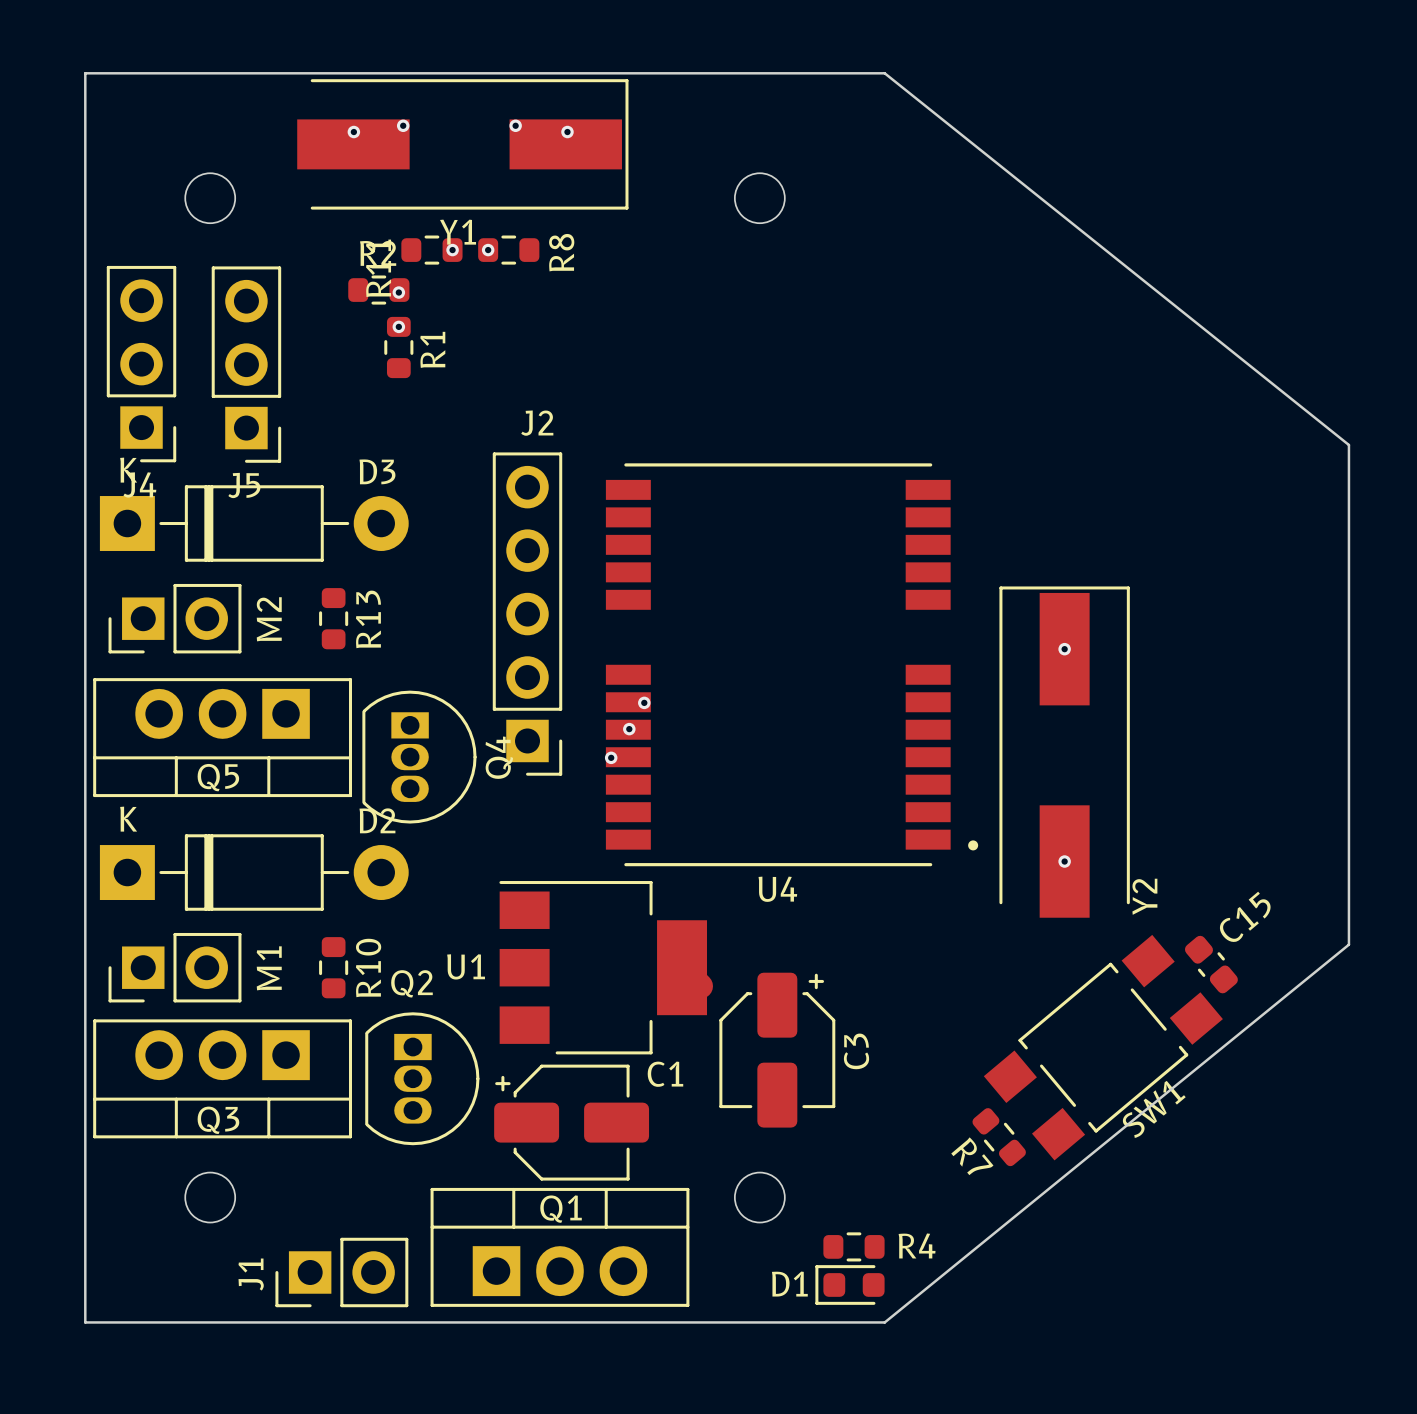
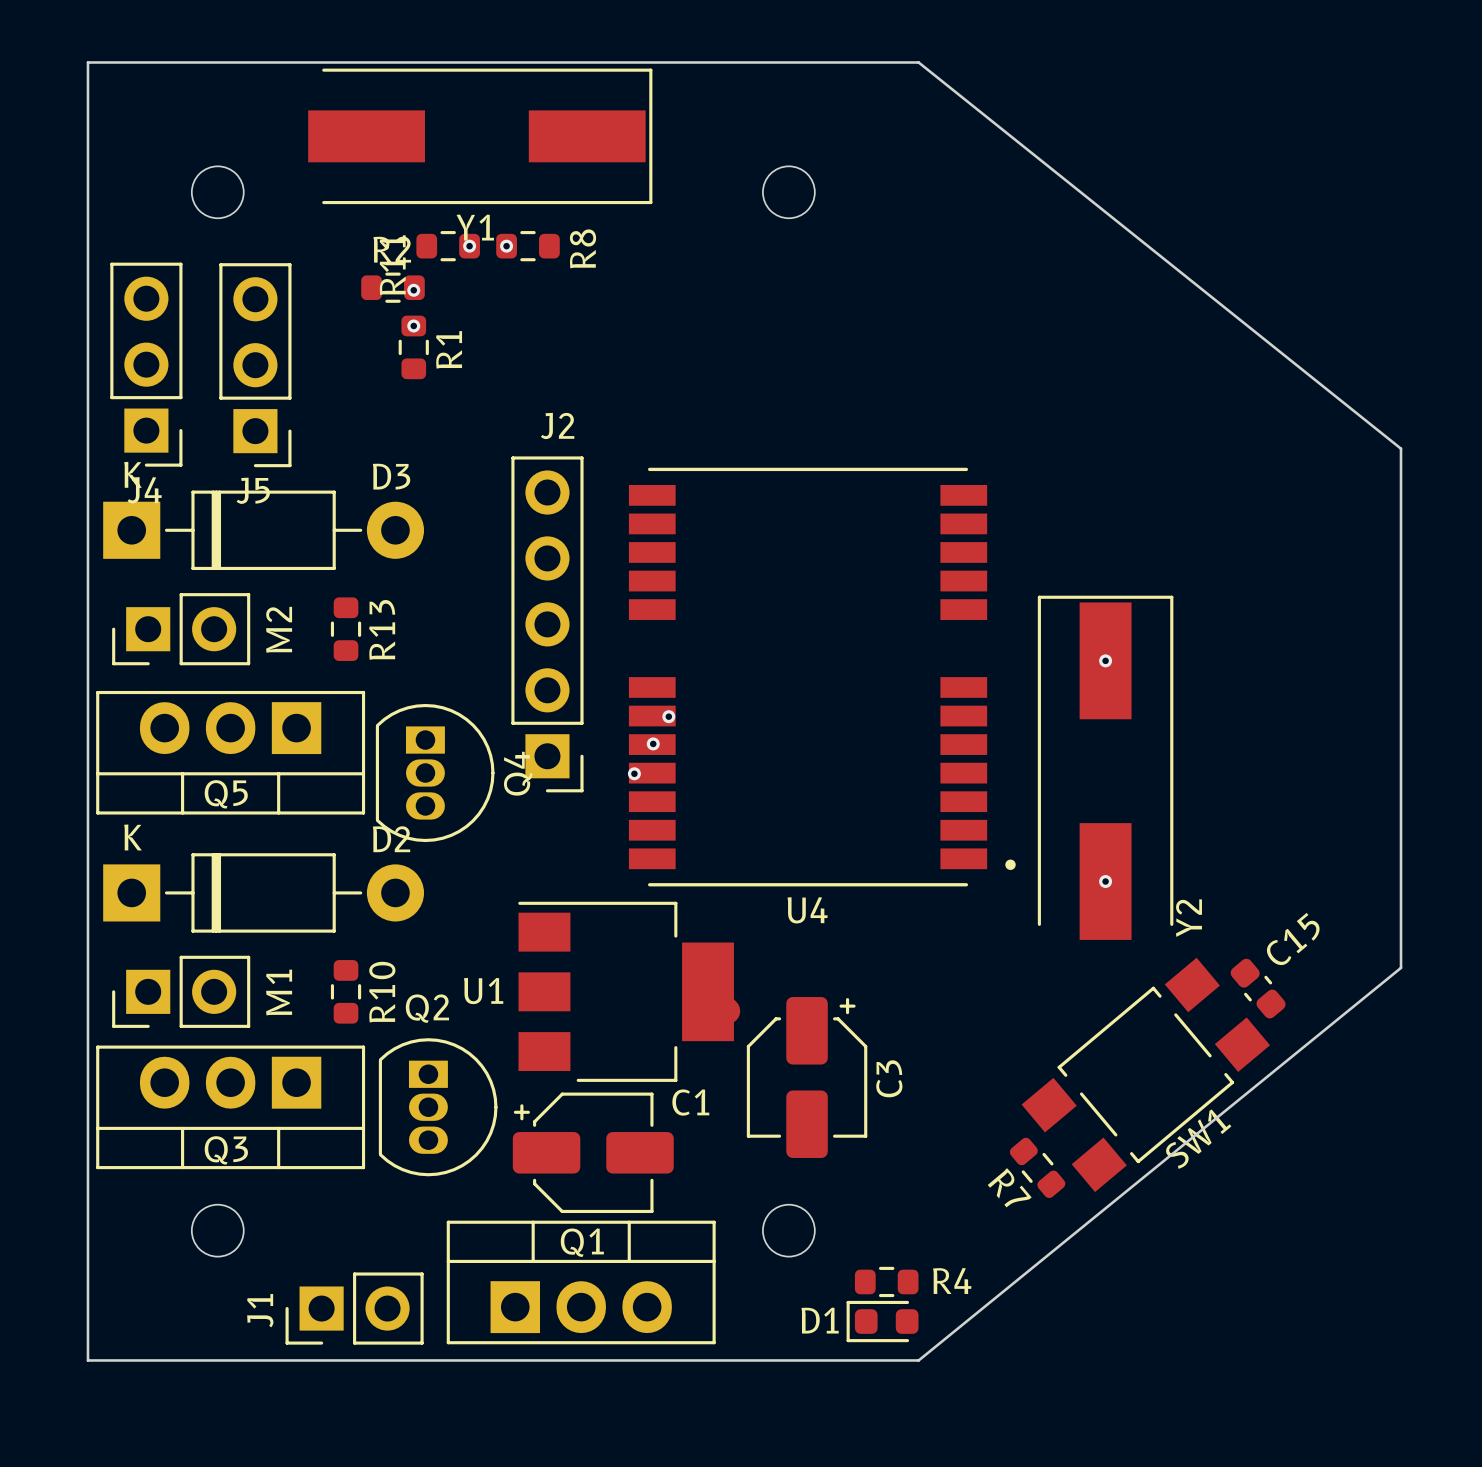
via: (403, 125) -> none
via: (515, 125) -> none
via: (353, 132) -> none
via: (567, 132) -> none

